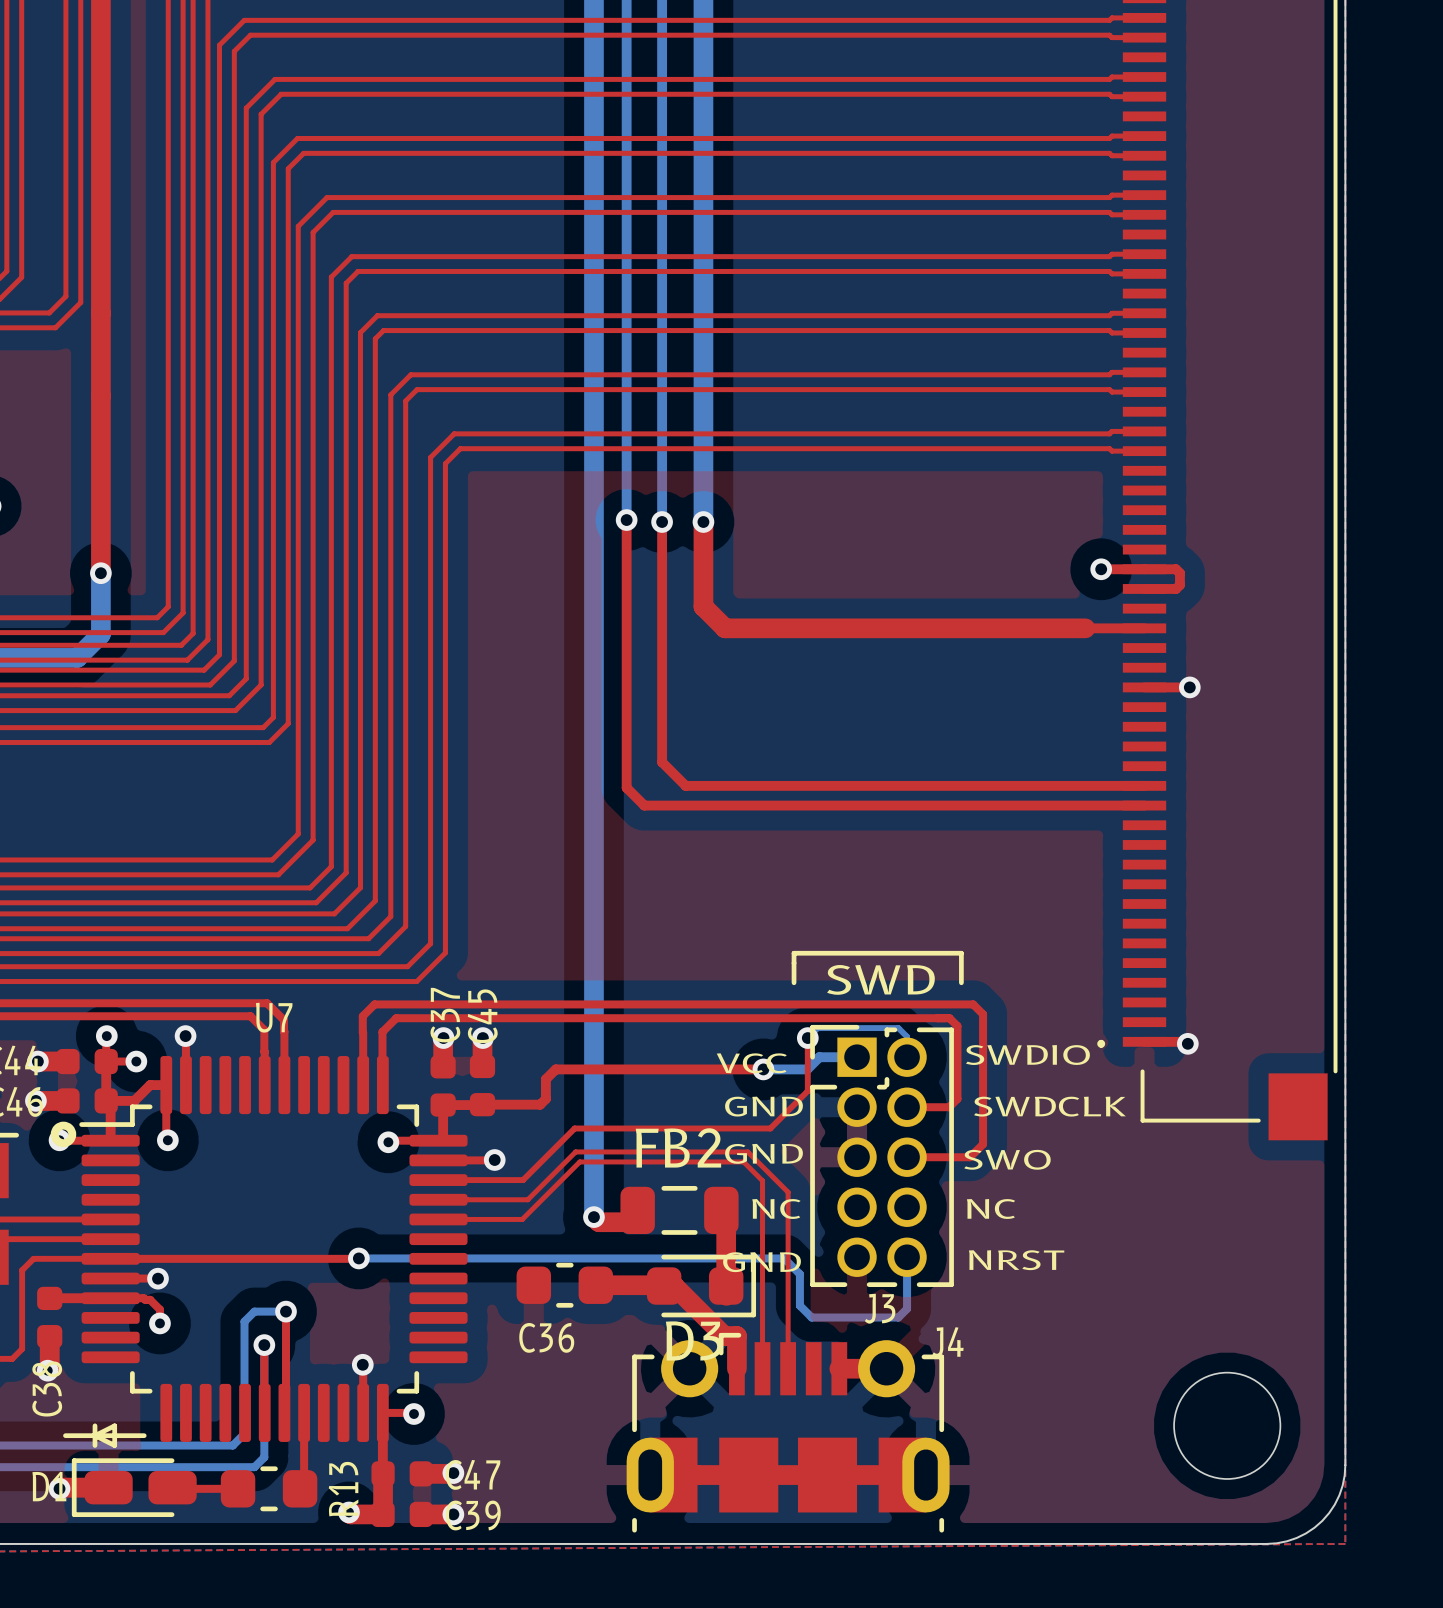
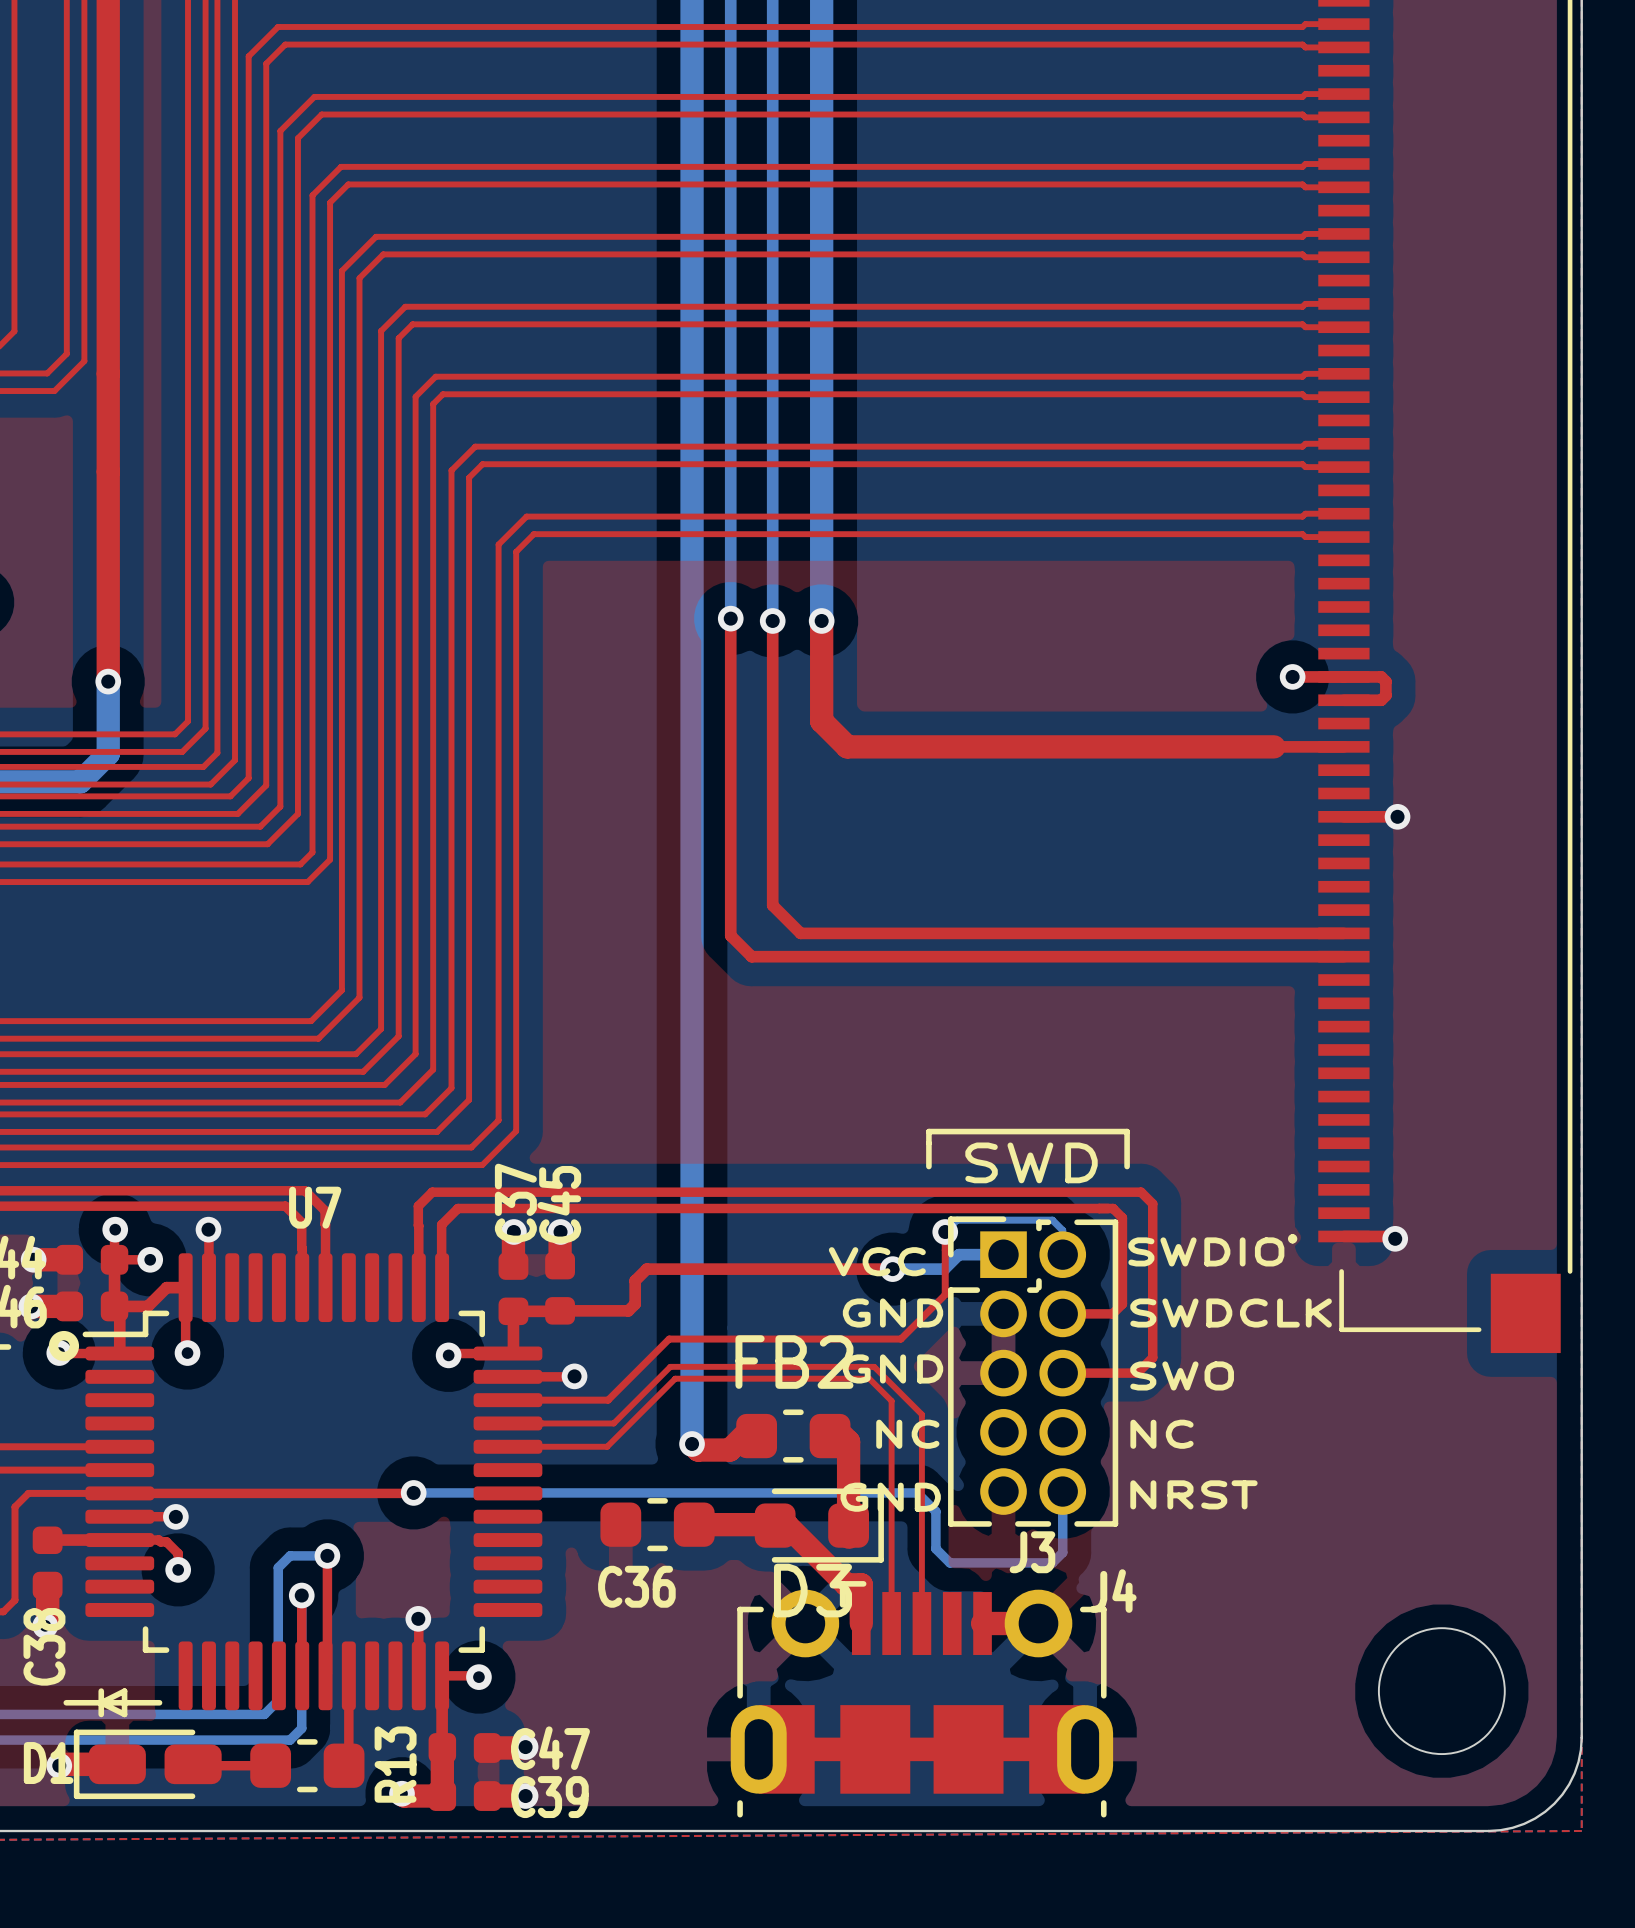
FB2 footprint: [620, 1185, 739, 1235] -> [736, 1409, 851, 1463]

